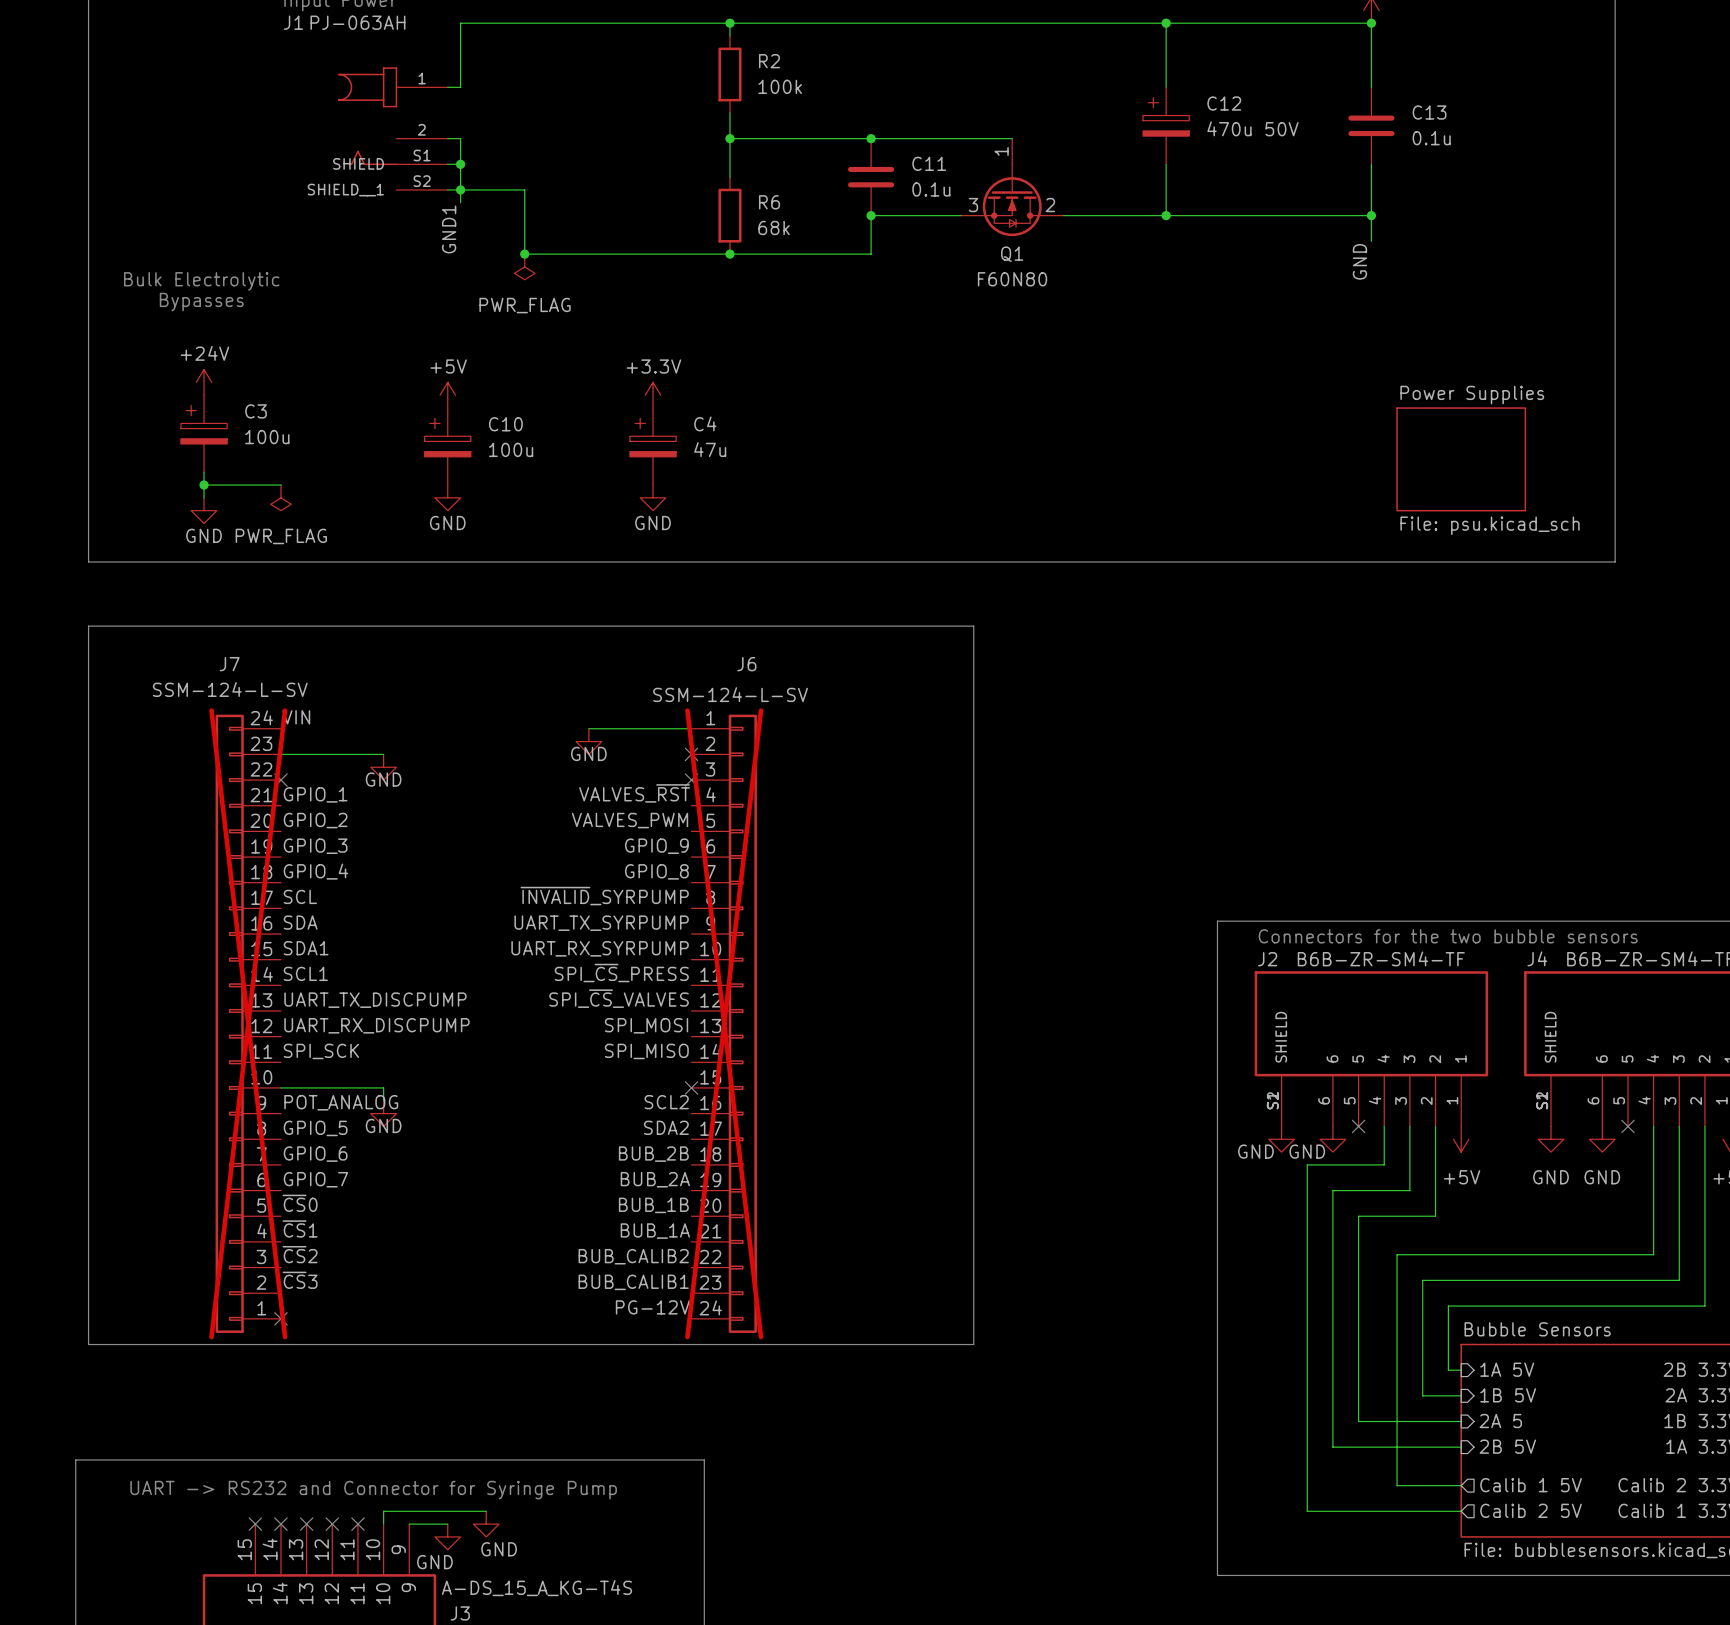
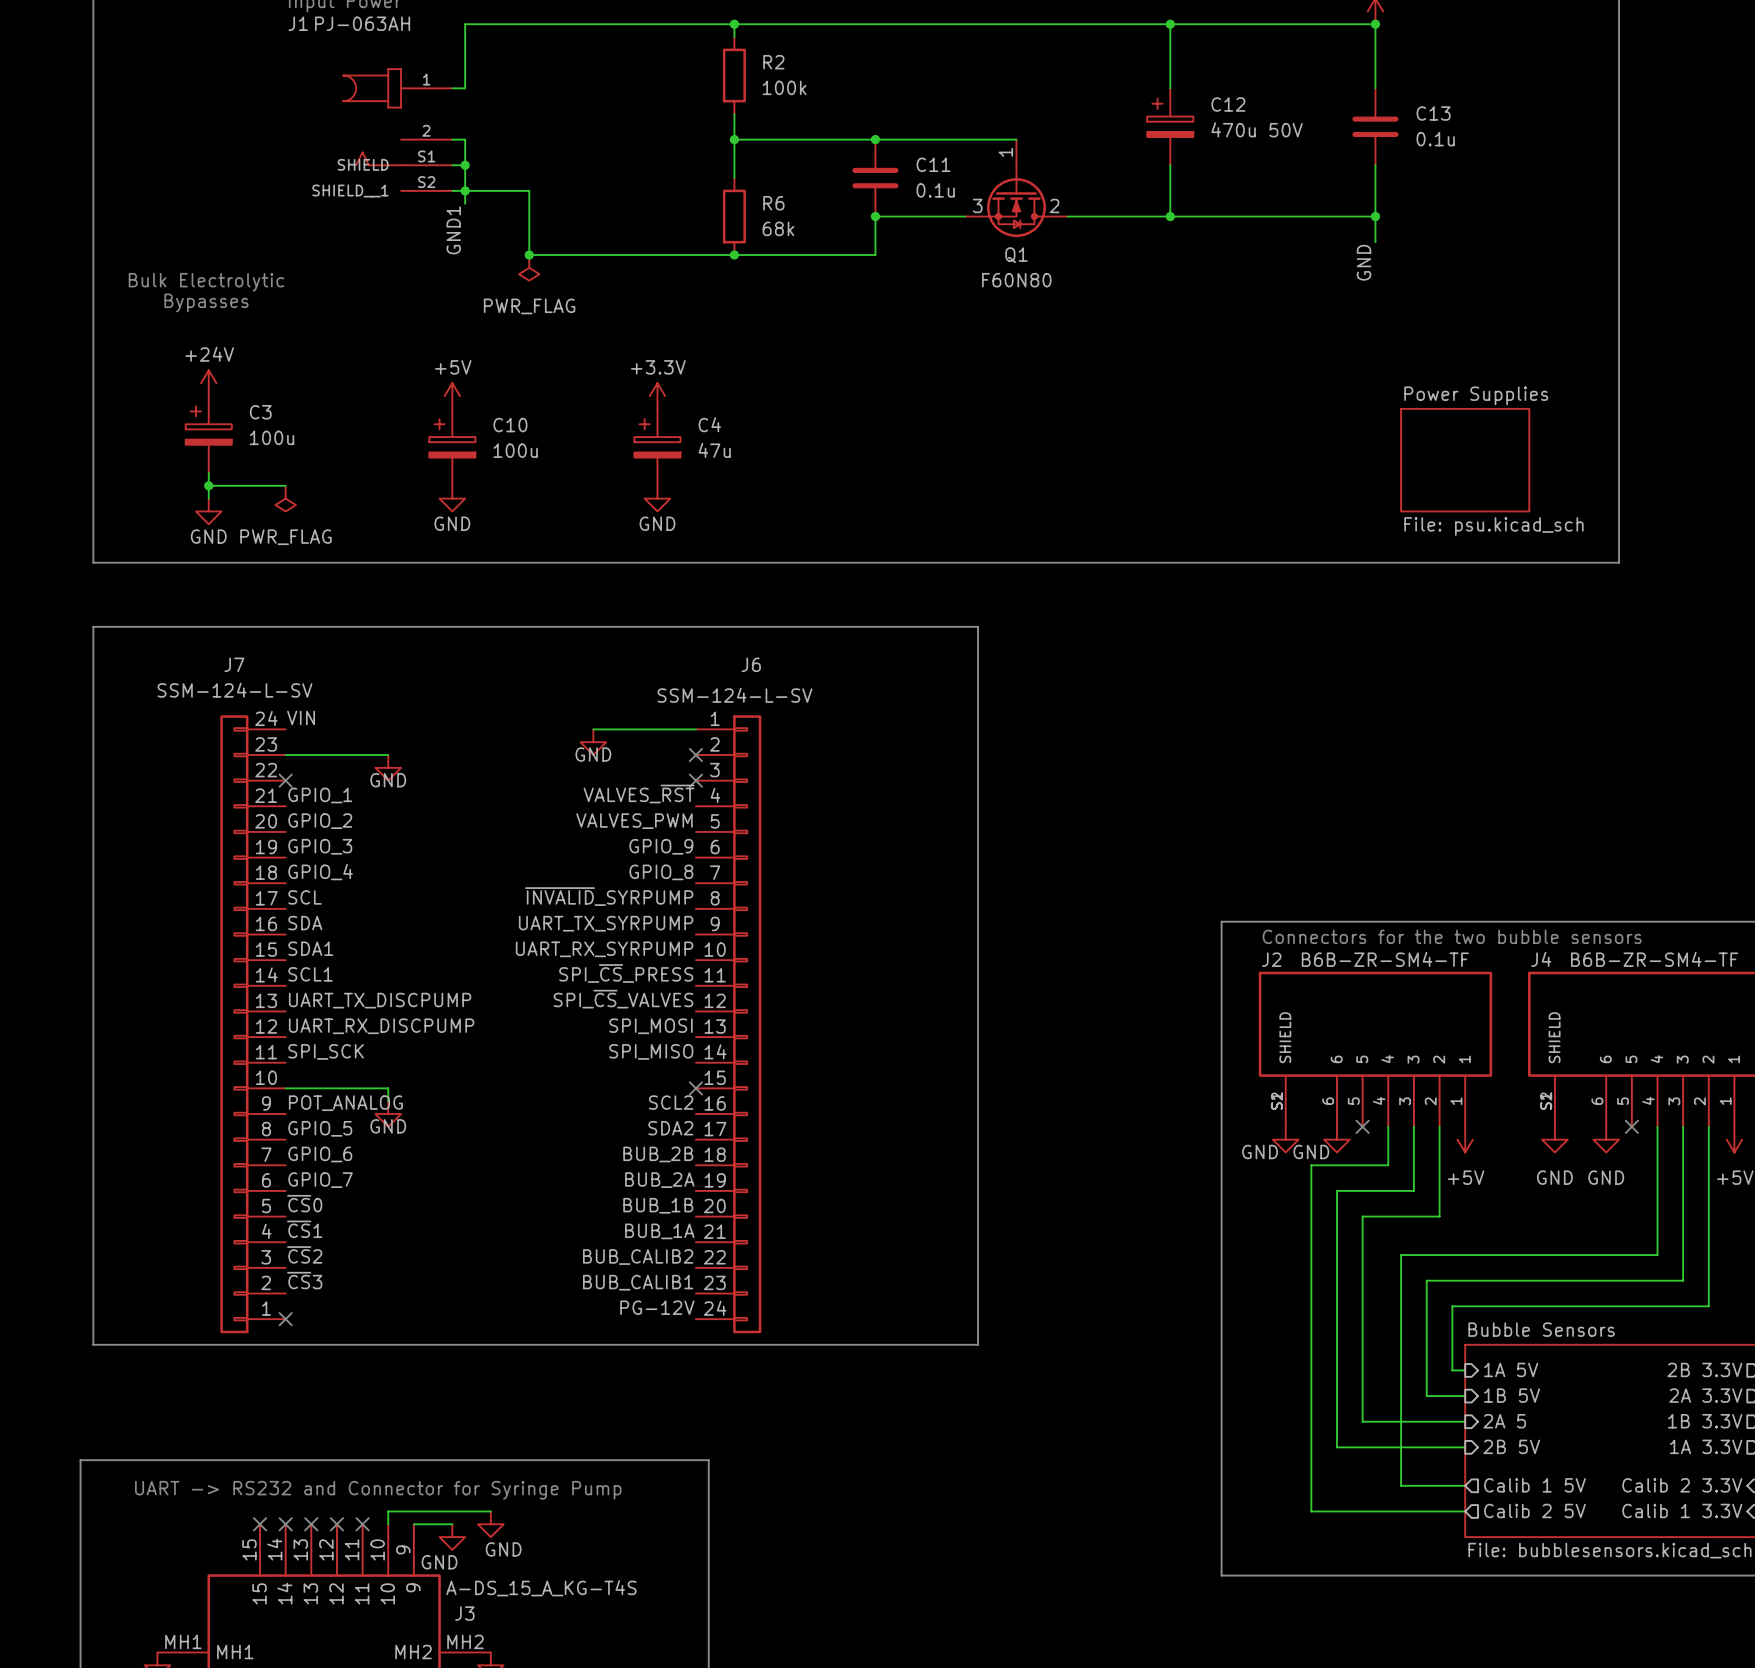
J7 do-not-place cross: (248, 1023) -> none
J6 do-not-place cross: (724, 1023) -> none

